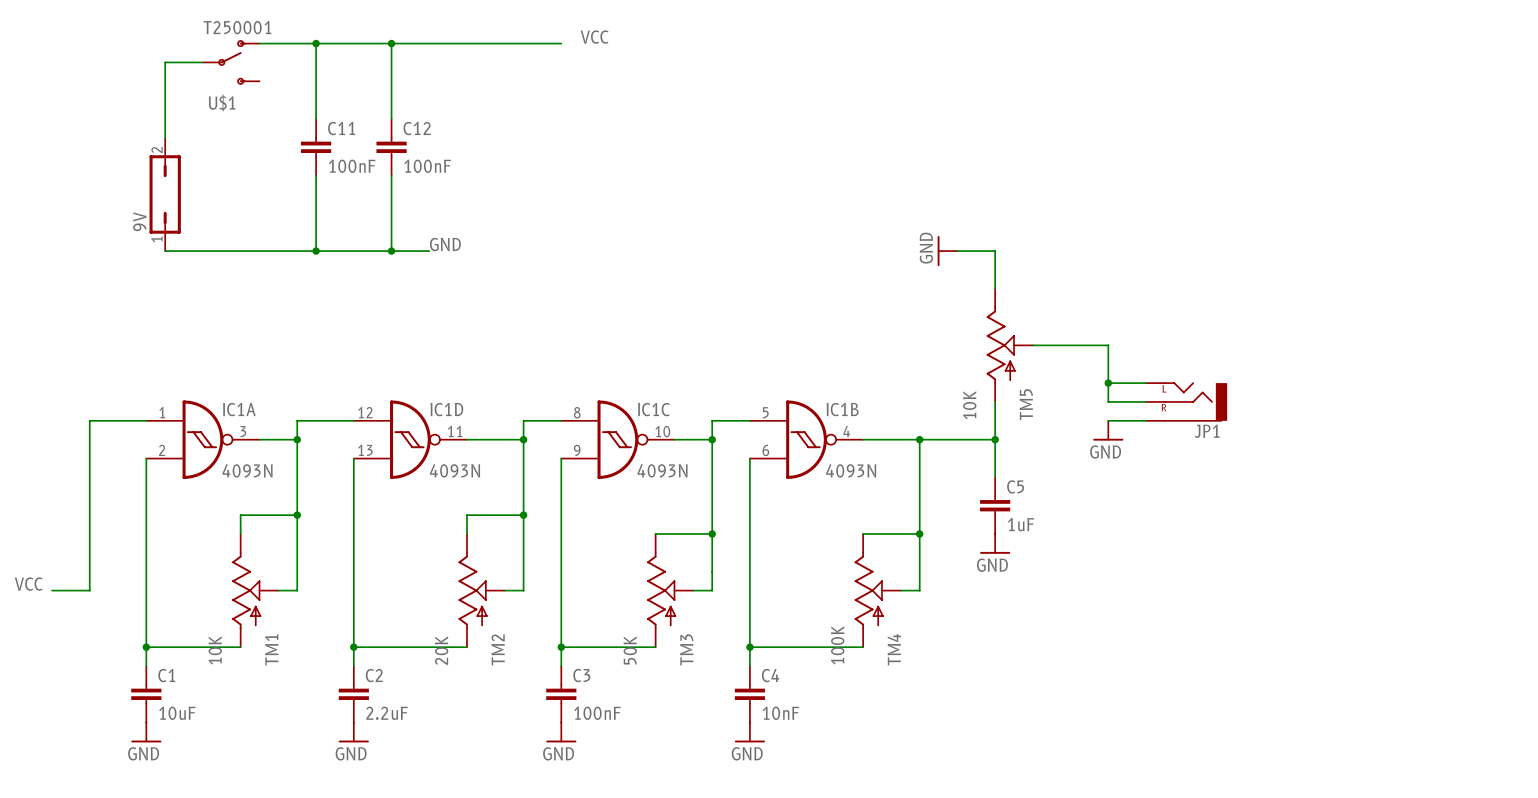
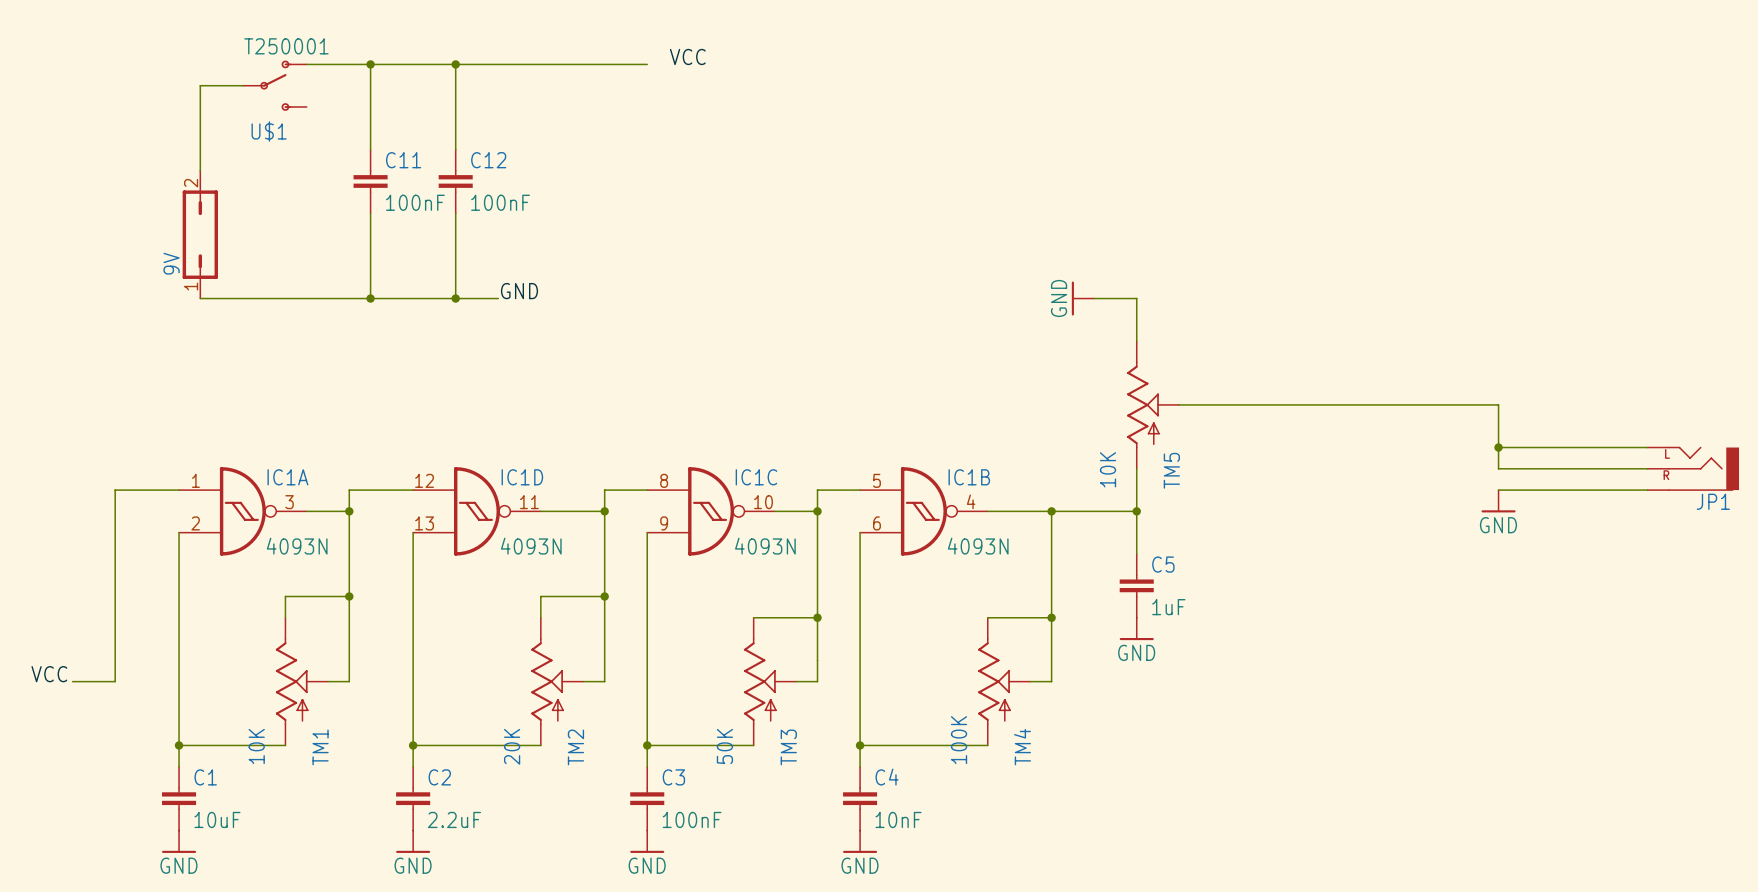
wire: (1108, 345) (1108, 401) (1146, 401) -> (1264, 404) (1498, 404) (1498, 468) (1647, 468)
wire: (1108, 383) (1146, 383) -> none
junction: (1108, 383) -> none
wire: none -> (1498, 447) (1647, 447)
junction: none -> (1498, 447)
JP1 position: (1186, 401) -> (1693, 468)
wire: (1108, 420) (1146, 420) -> none
wire: none -> (1498, 490) (1647, 490)
power symbol: GND (1108, 430) -> none
power symbol: none -> GND (1498, 501)

